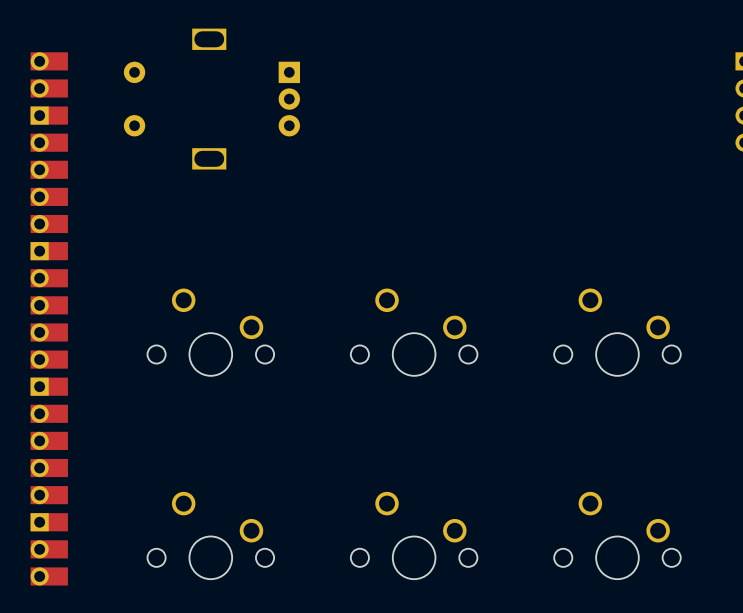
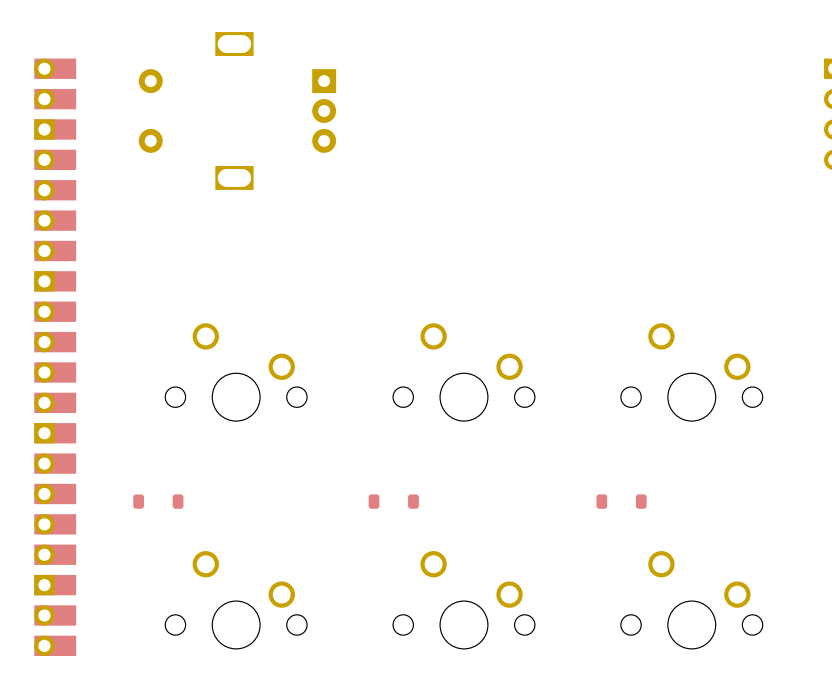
part: none -> (158, 501)
part: none -> (393, 501)
part: none -> (621, 501)

